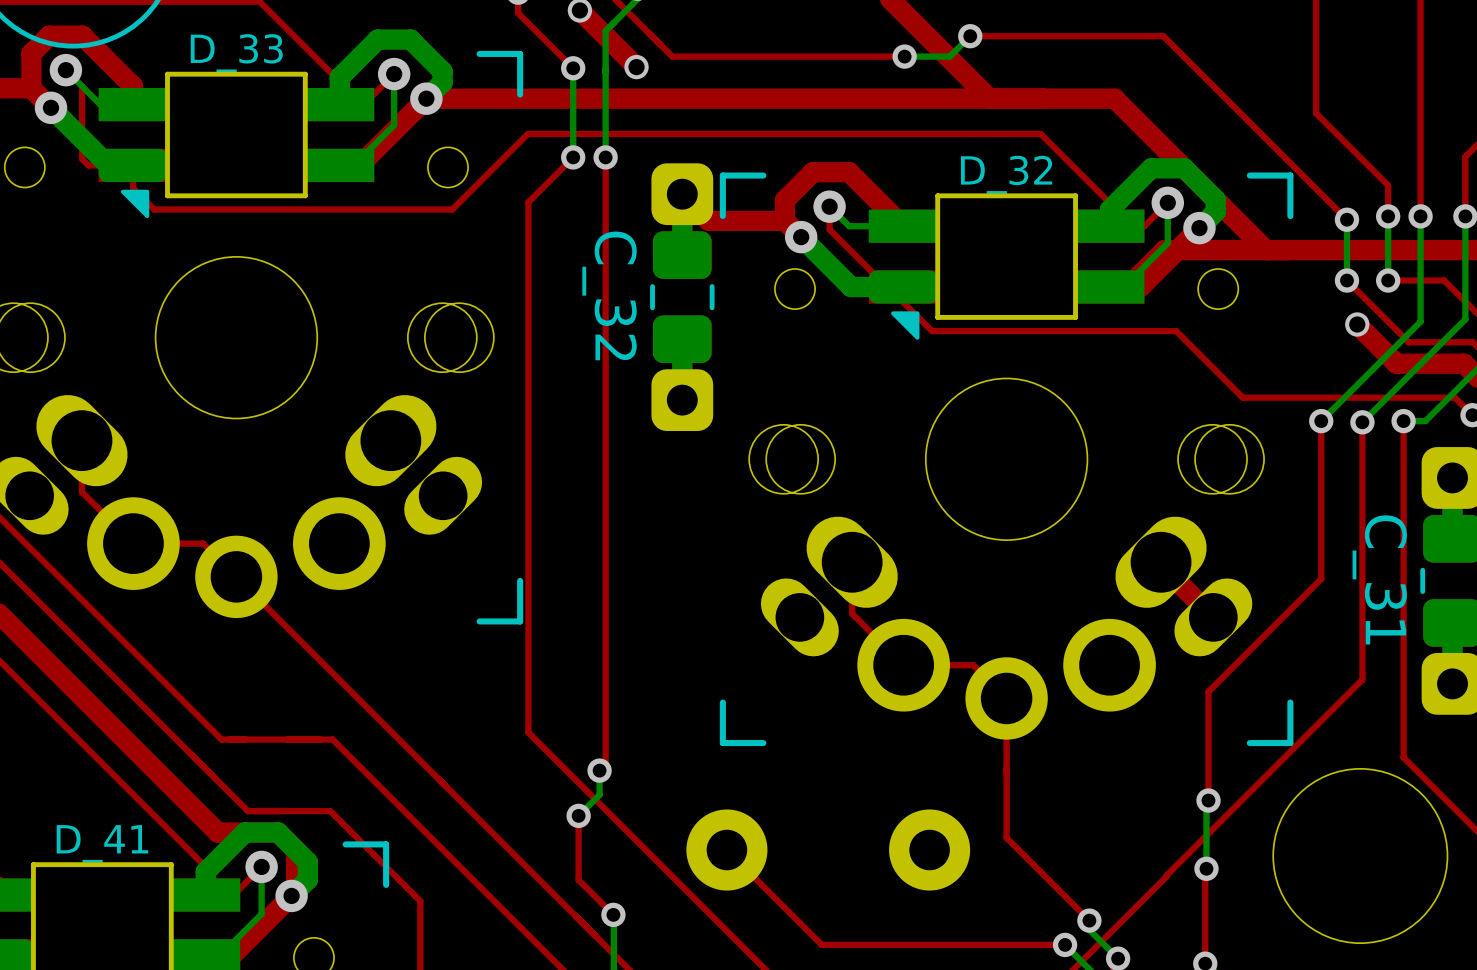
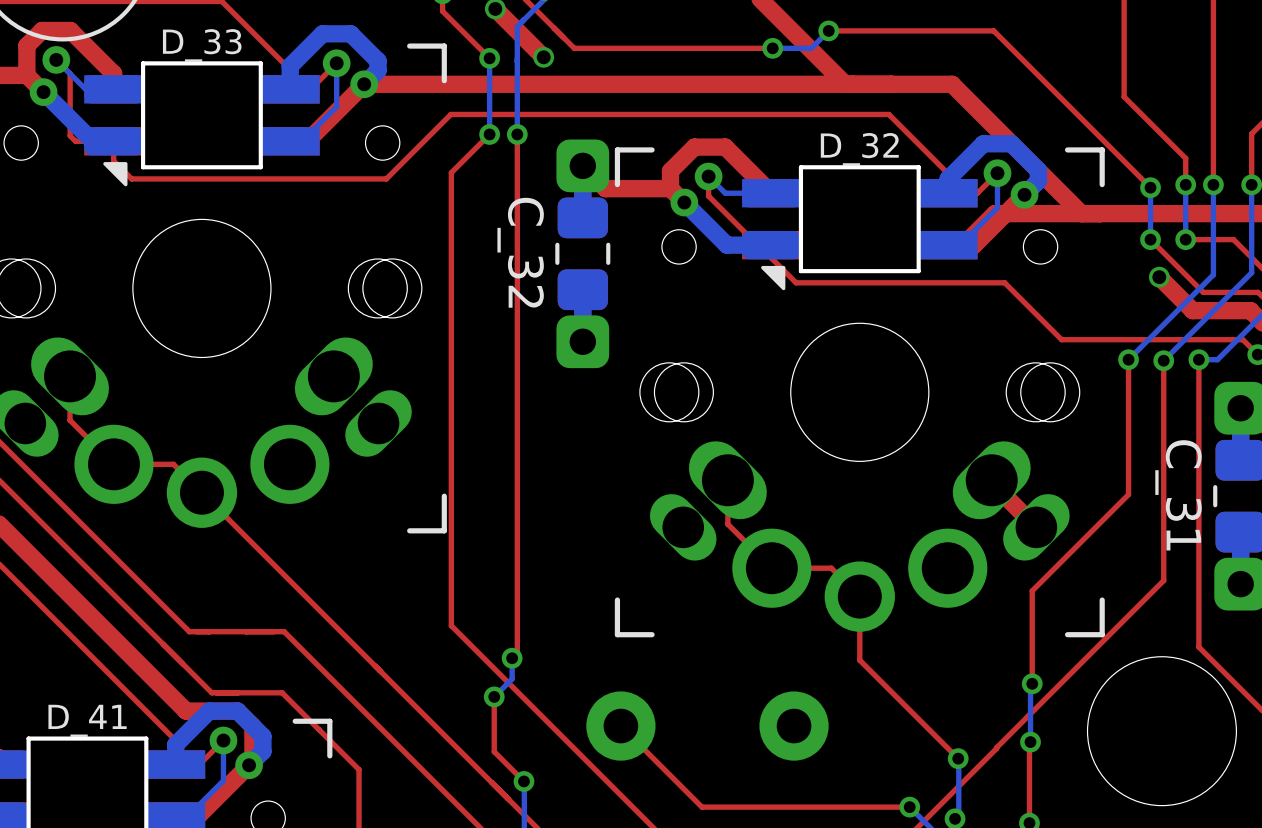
top track: (1006, 772) (1006, 837) (1089, 920) -> (859, 660) (958, 758)
bottom track: none -> (958, 758) (958, 814)
bottom track: (1089, 920) (1089, 929) (1118, 958) -> none
via position: (1089, 920) -> (958, 758)

